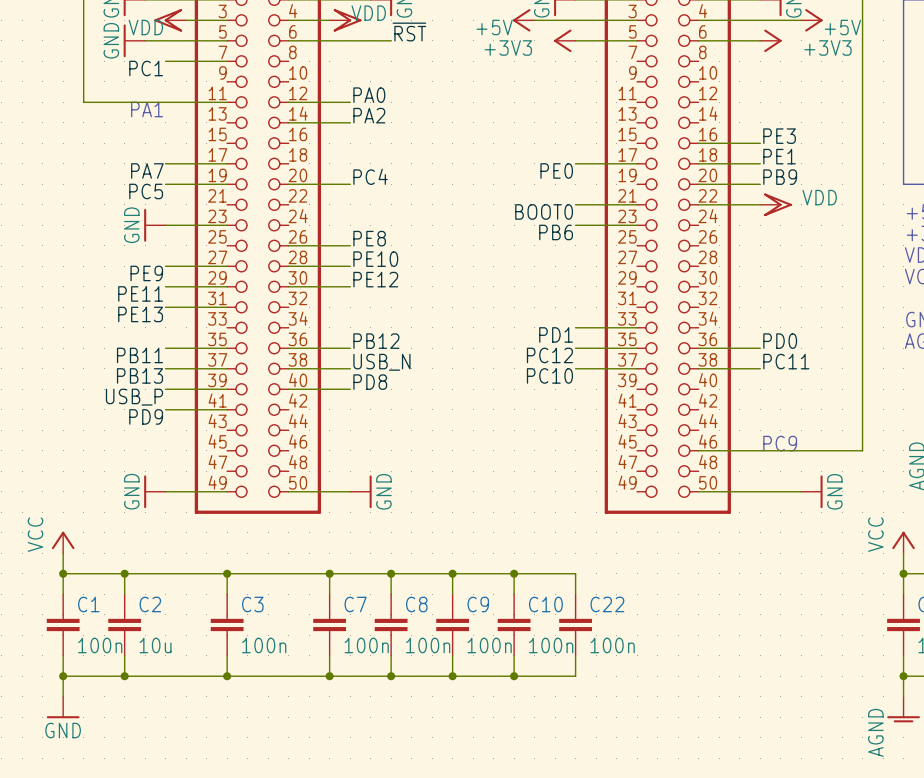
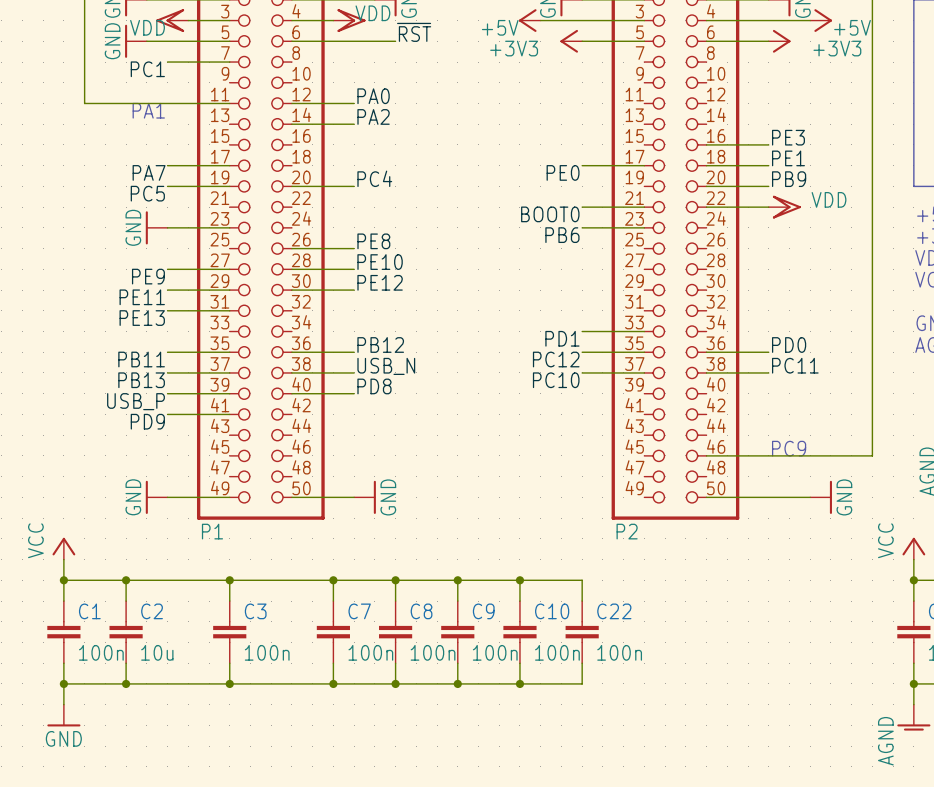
part value: none -> P1 (212, 531)
part value: none -> P2 (627, 531)

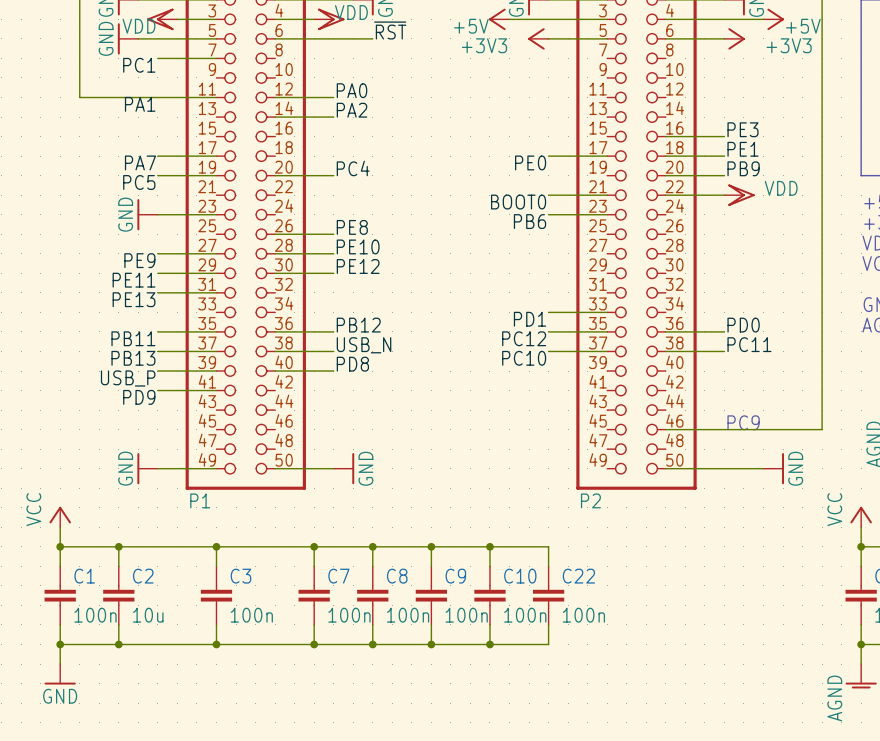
text: PA1 (148, 110) -> none
label: none -> PA1 (140, 104)

